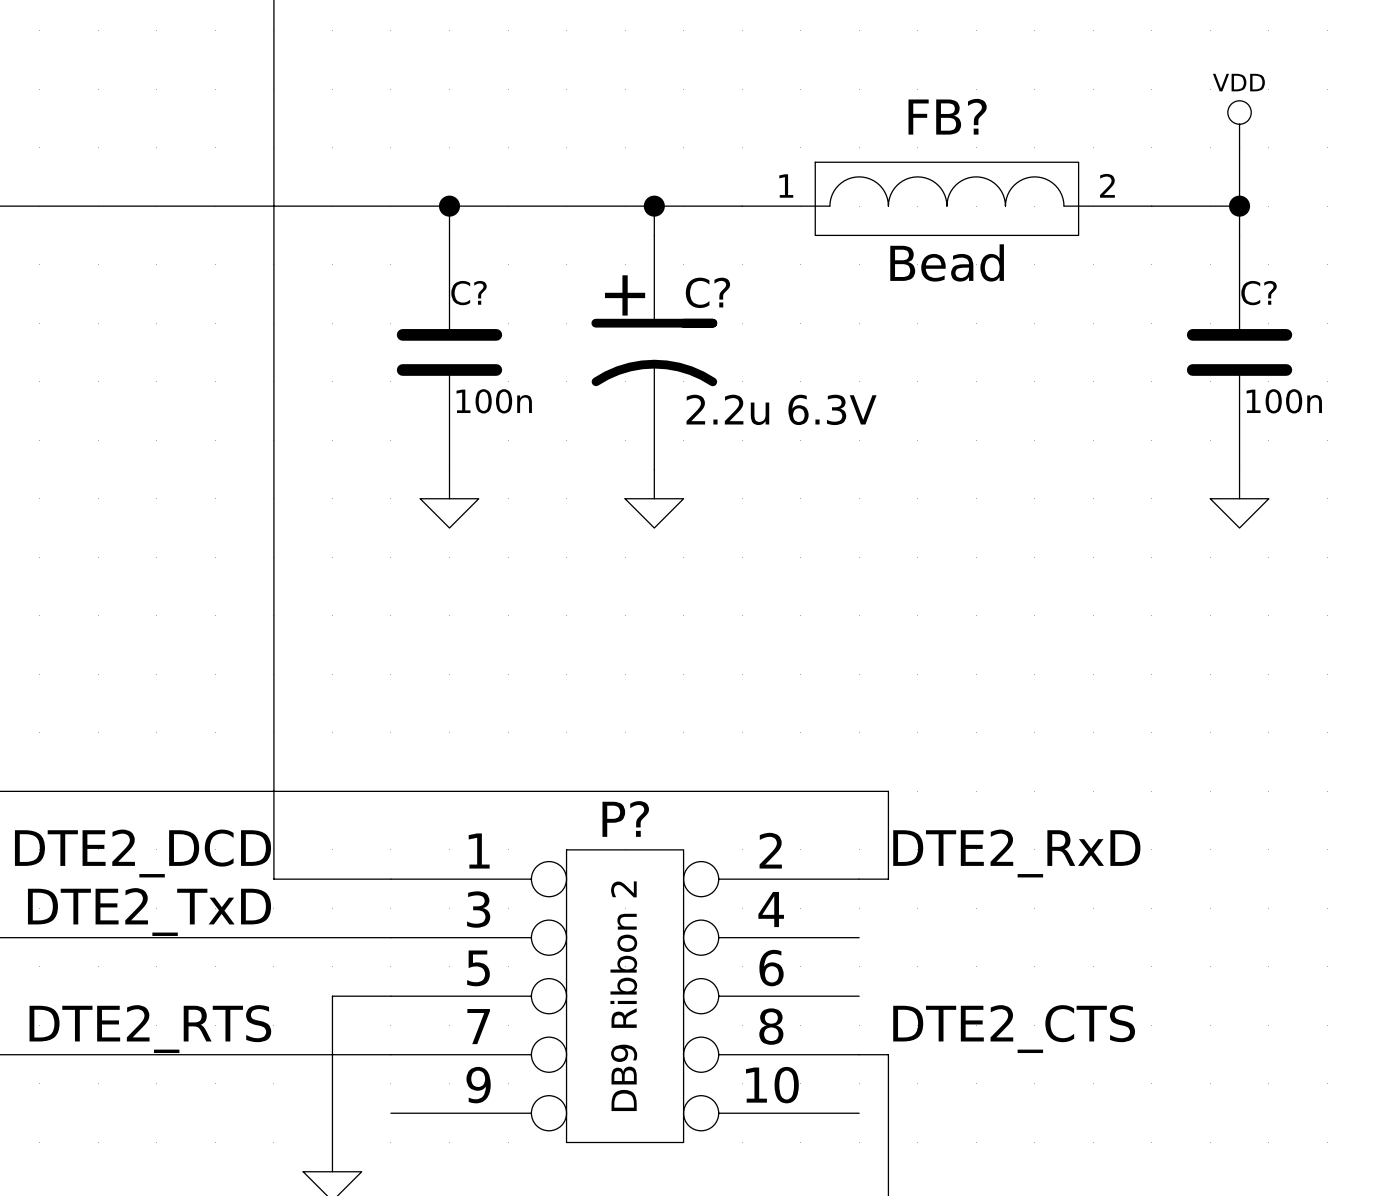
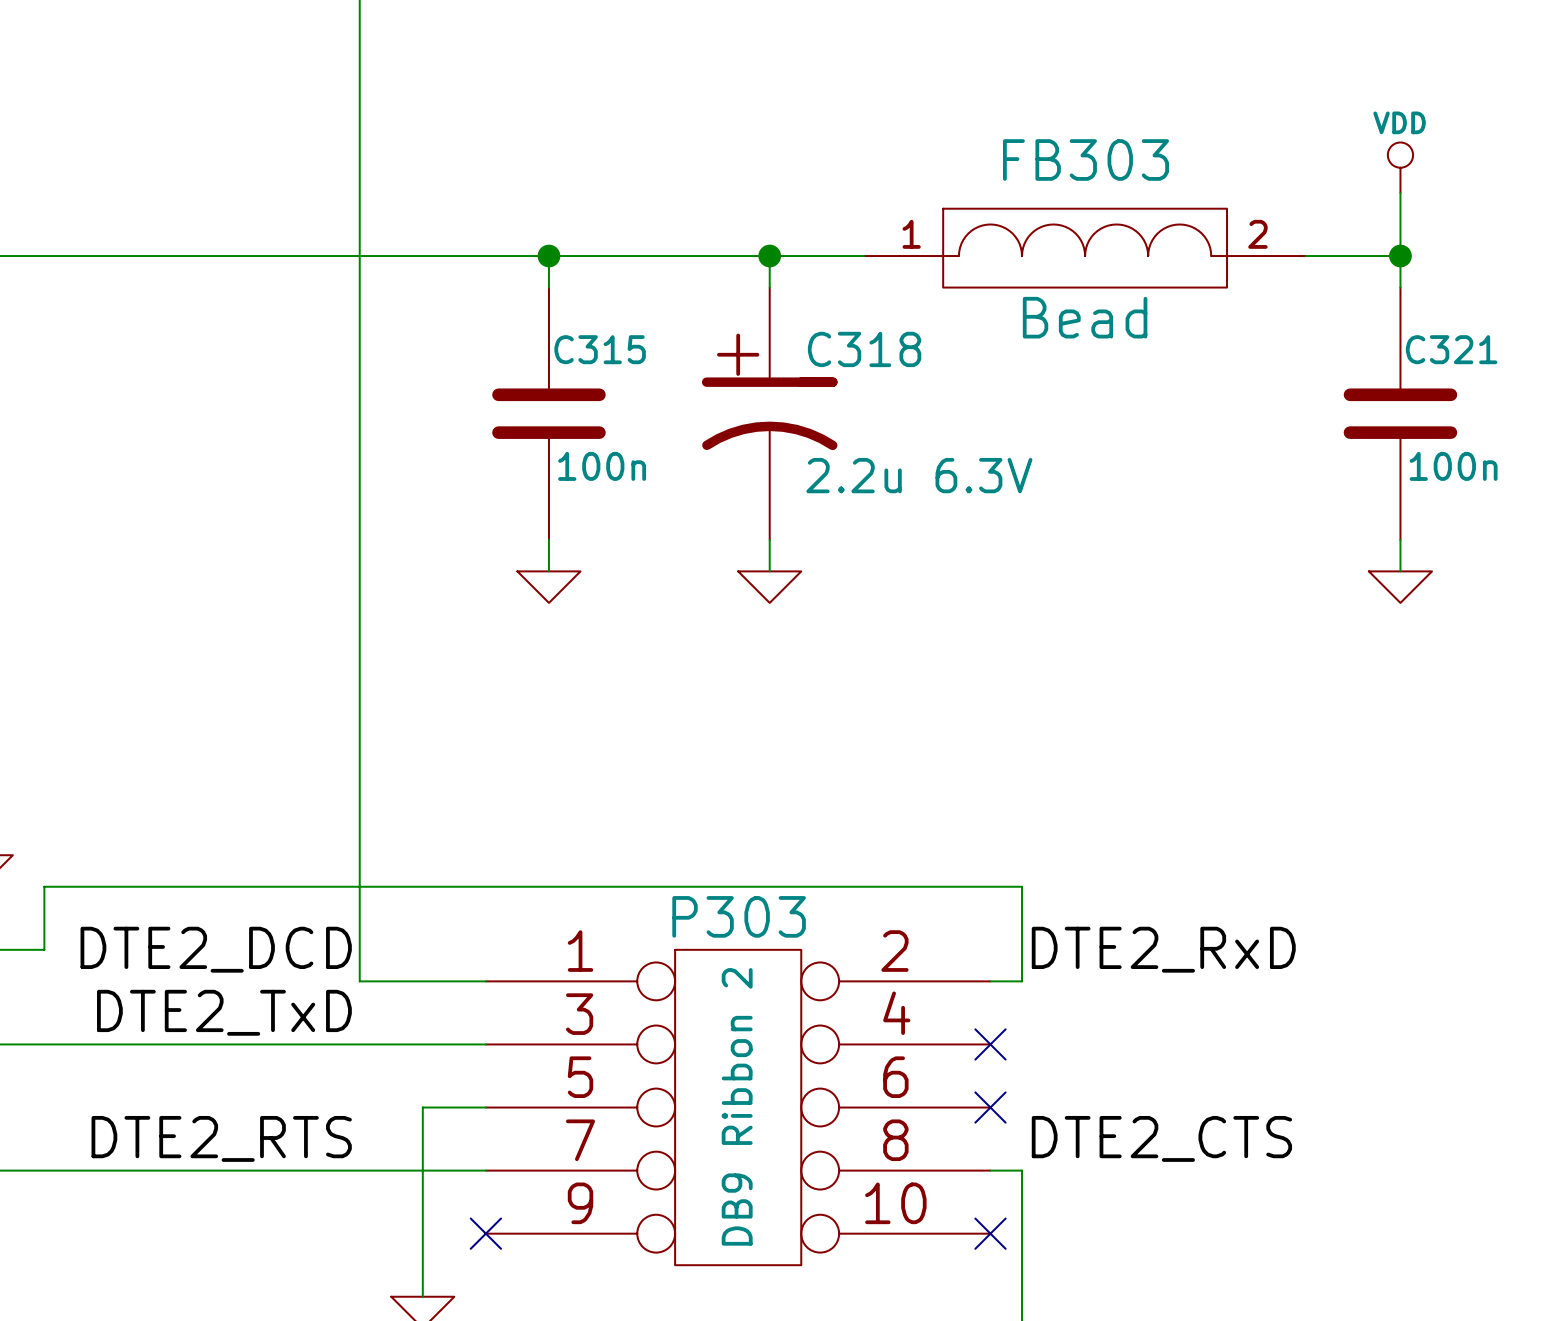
FB? name: FB? (947, 116) -> FB303 (1085, 159)
C? name: C? (707, 292) -> C318 (864, 349)
C? name: C? (469, 293) -> C315 (600, 349)
C? name: C? (1259, 293) -> C321 (1451, 349)
P? name: P? (625, 818) -> P303 (739, 916)
no-connect mark: none -> (990, 1044)
no-connect mark: none -> (990, 1107)
no-connect mark: none -> (485, 1233)
no-connect mark: none -> (990, 1233)

